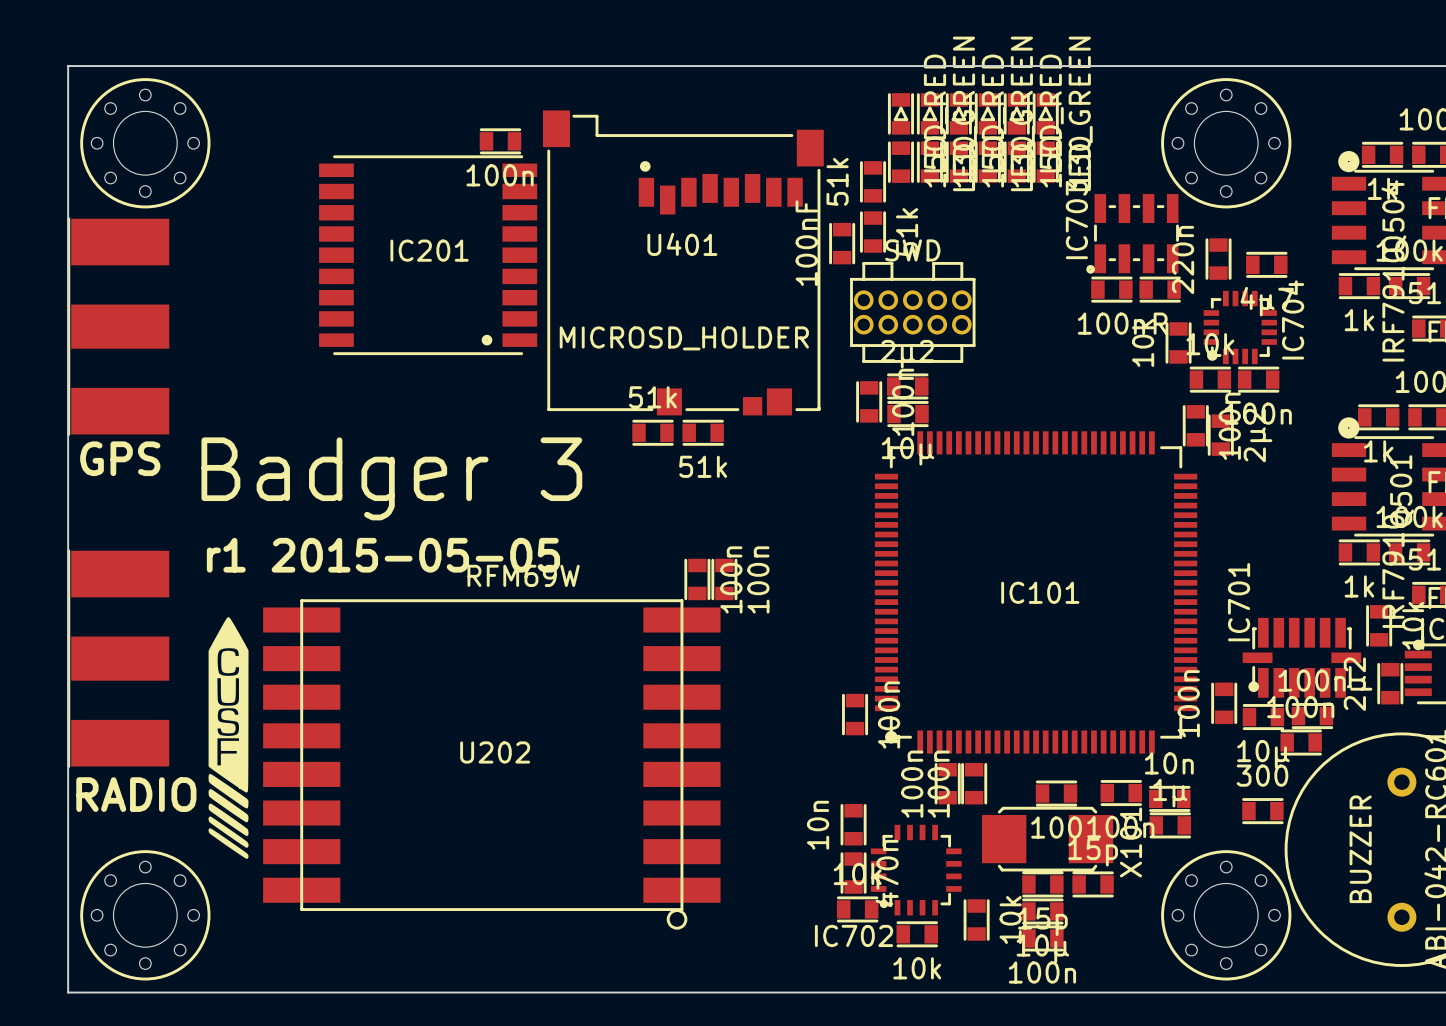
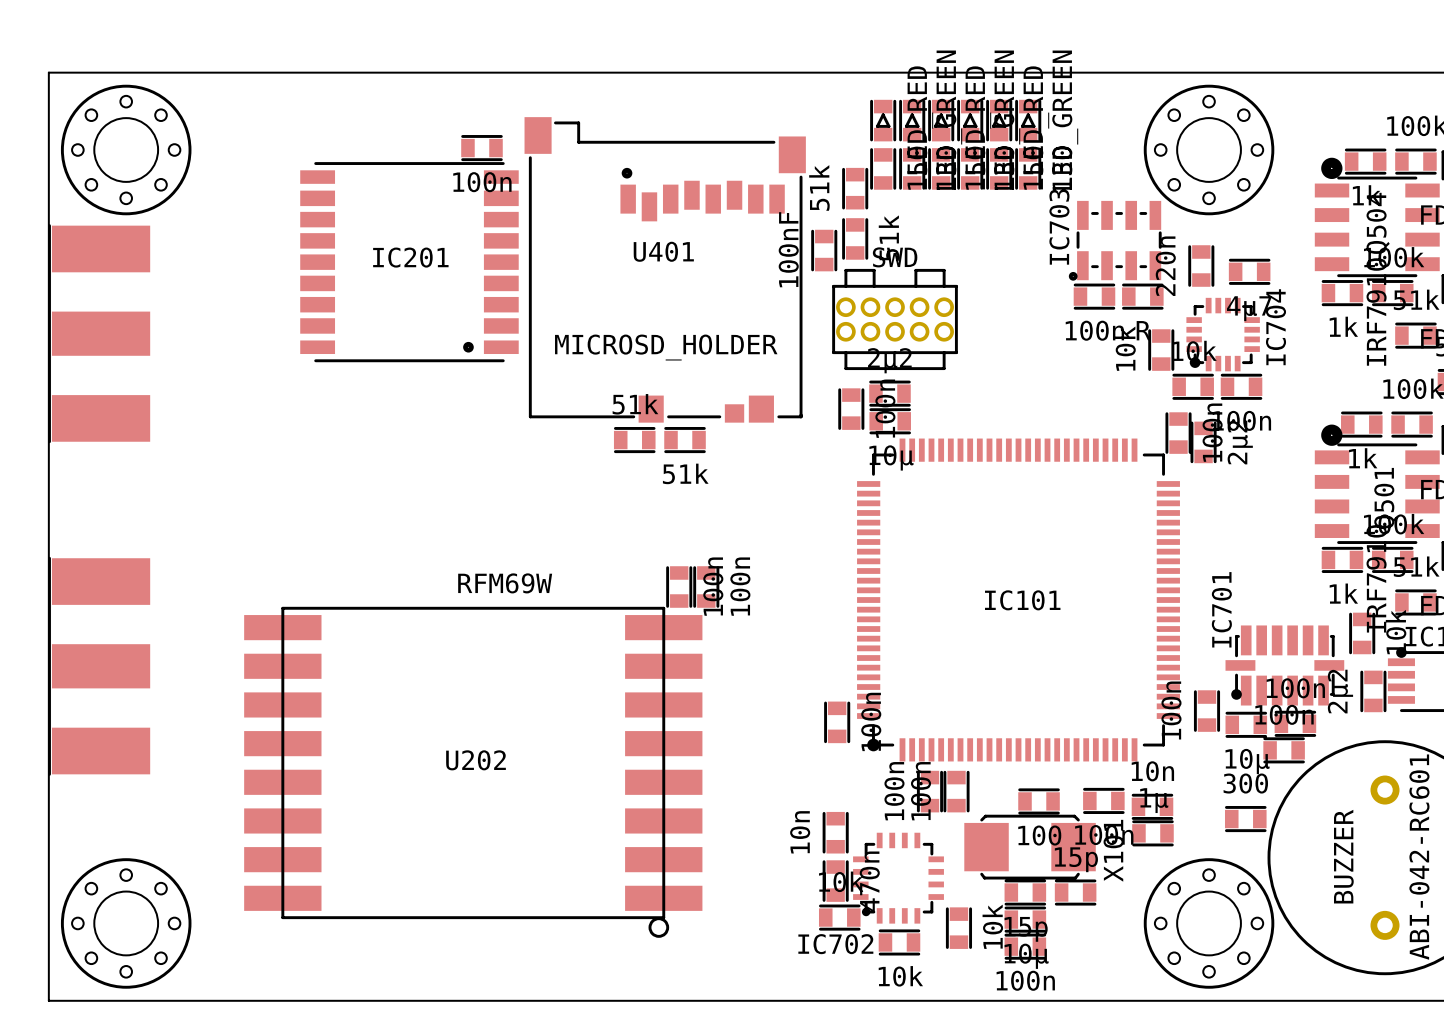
text: GPS (120, 458) -> none
text: Badger 3 (391, 478) -> none
text: r1 2015-05-05 (383, 555) -> none
drawing: [208, 617, 249, 859] -> none
text: RADIO (136, 794) -> none

